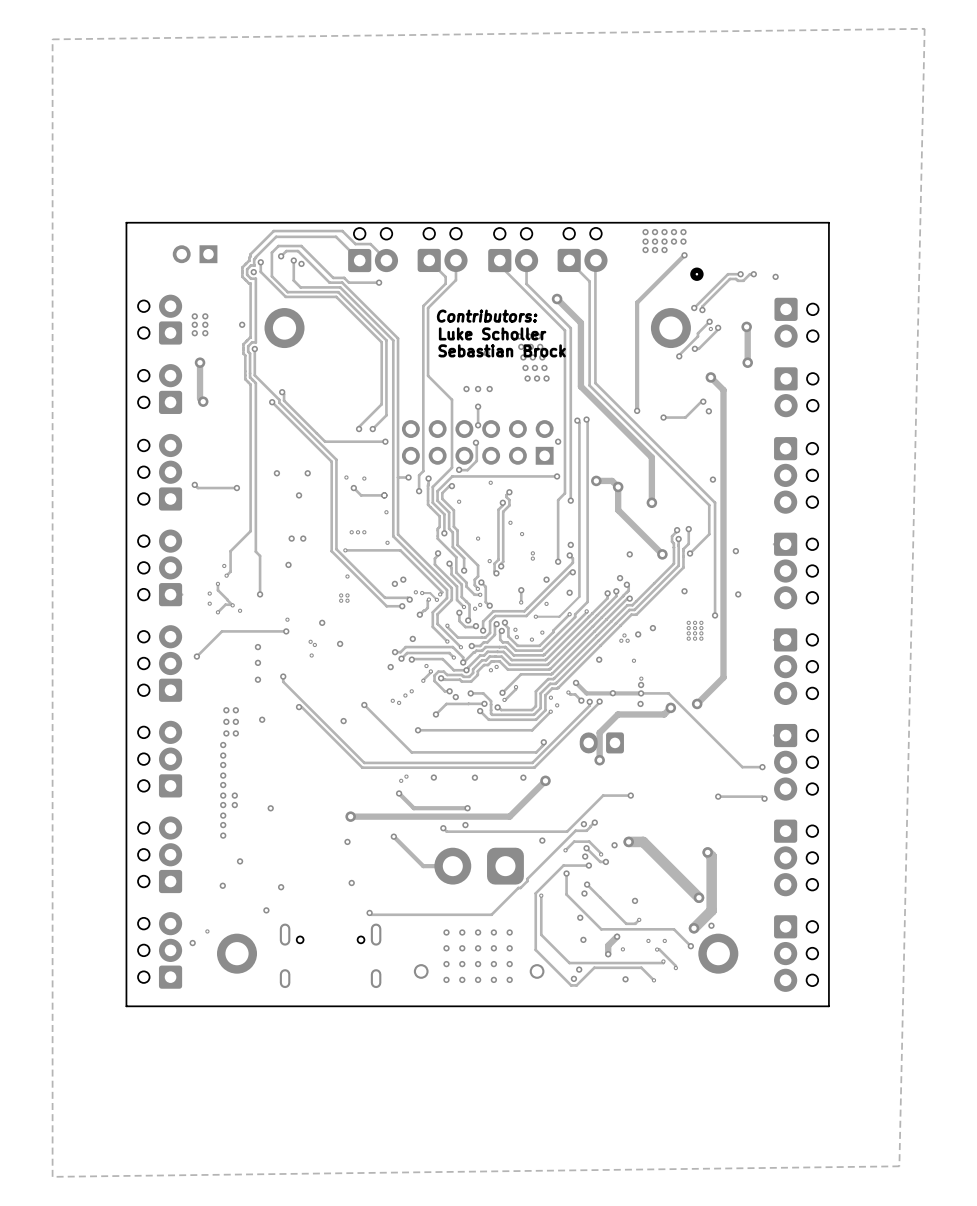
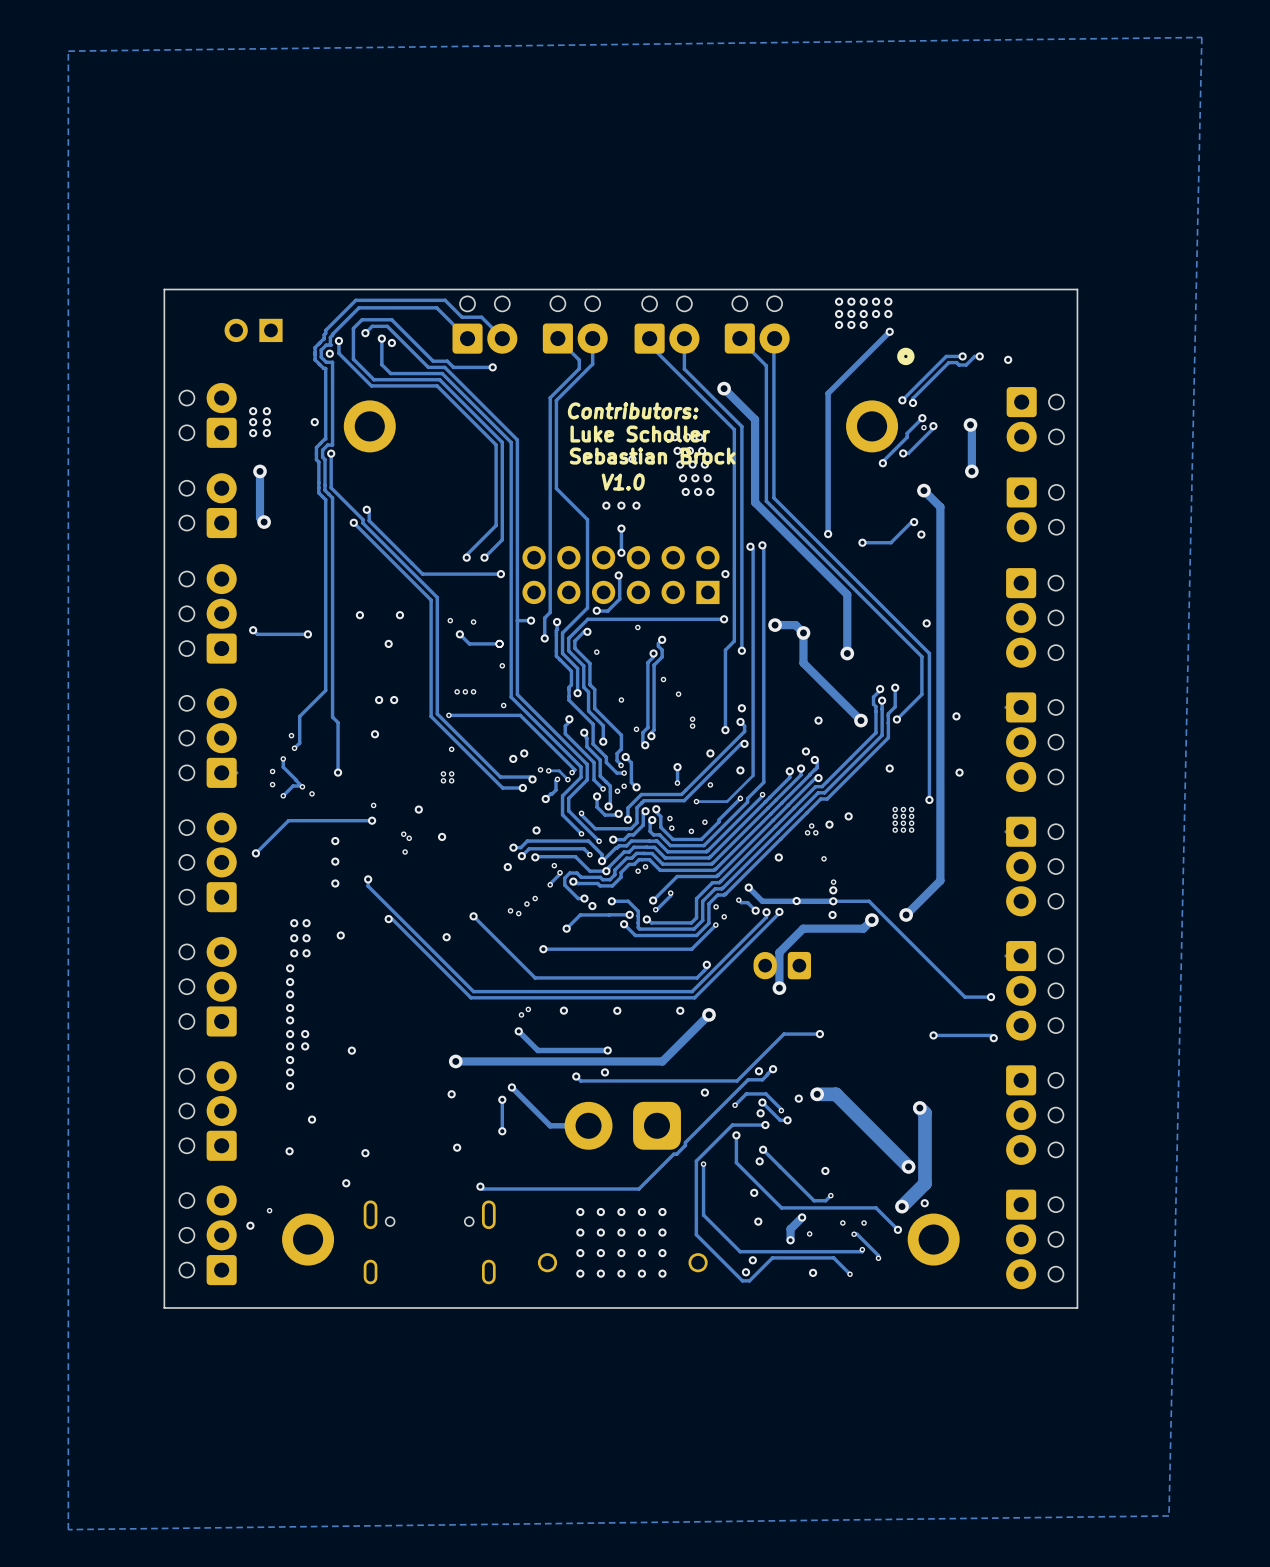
text: none -> V1.0 (623, 482)
track: none -> (502, 1099) (502, 1131)
via: none -> (502, 1099)
via: none -> (502, 1131)

